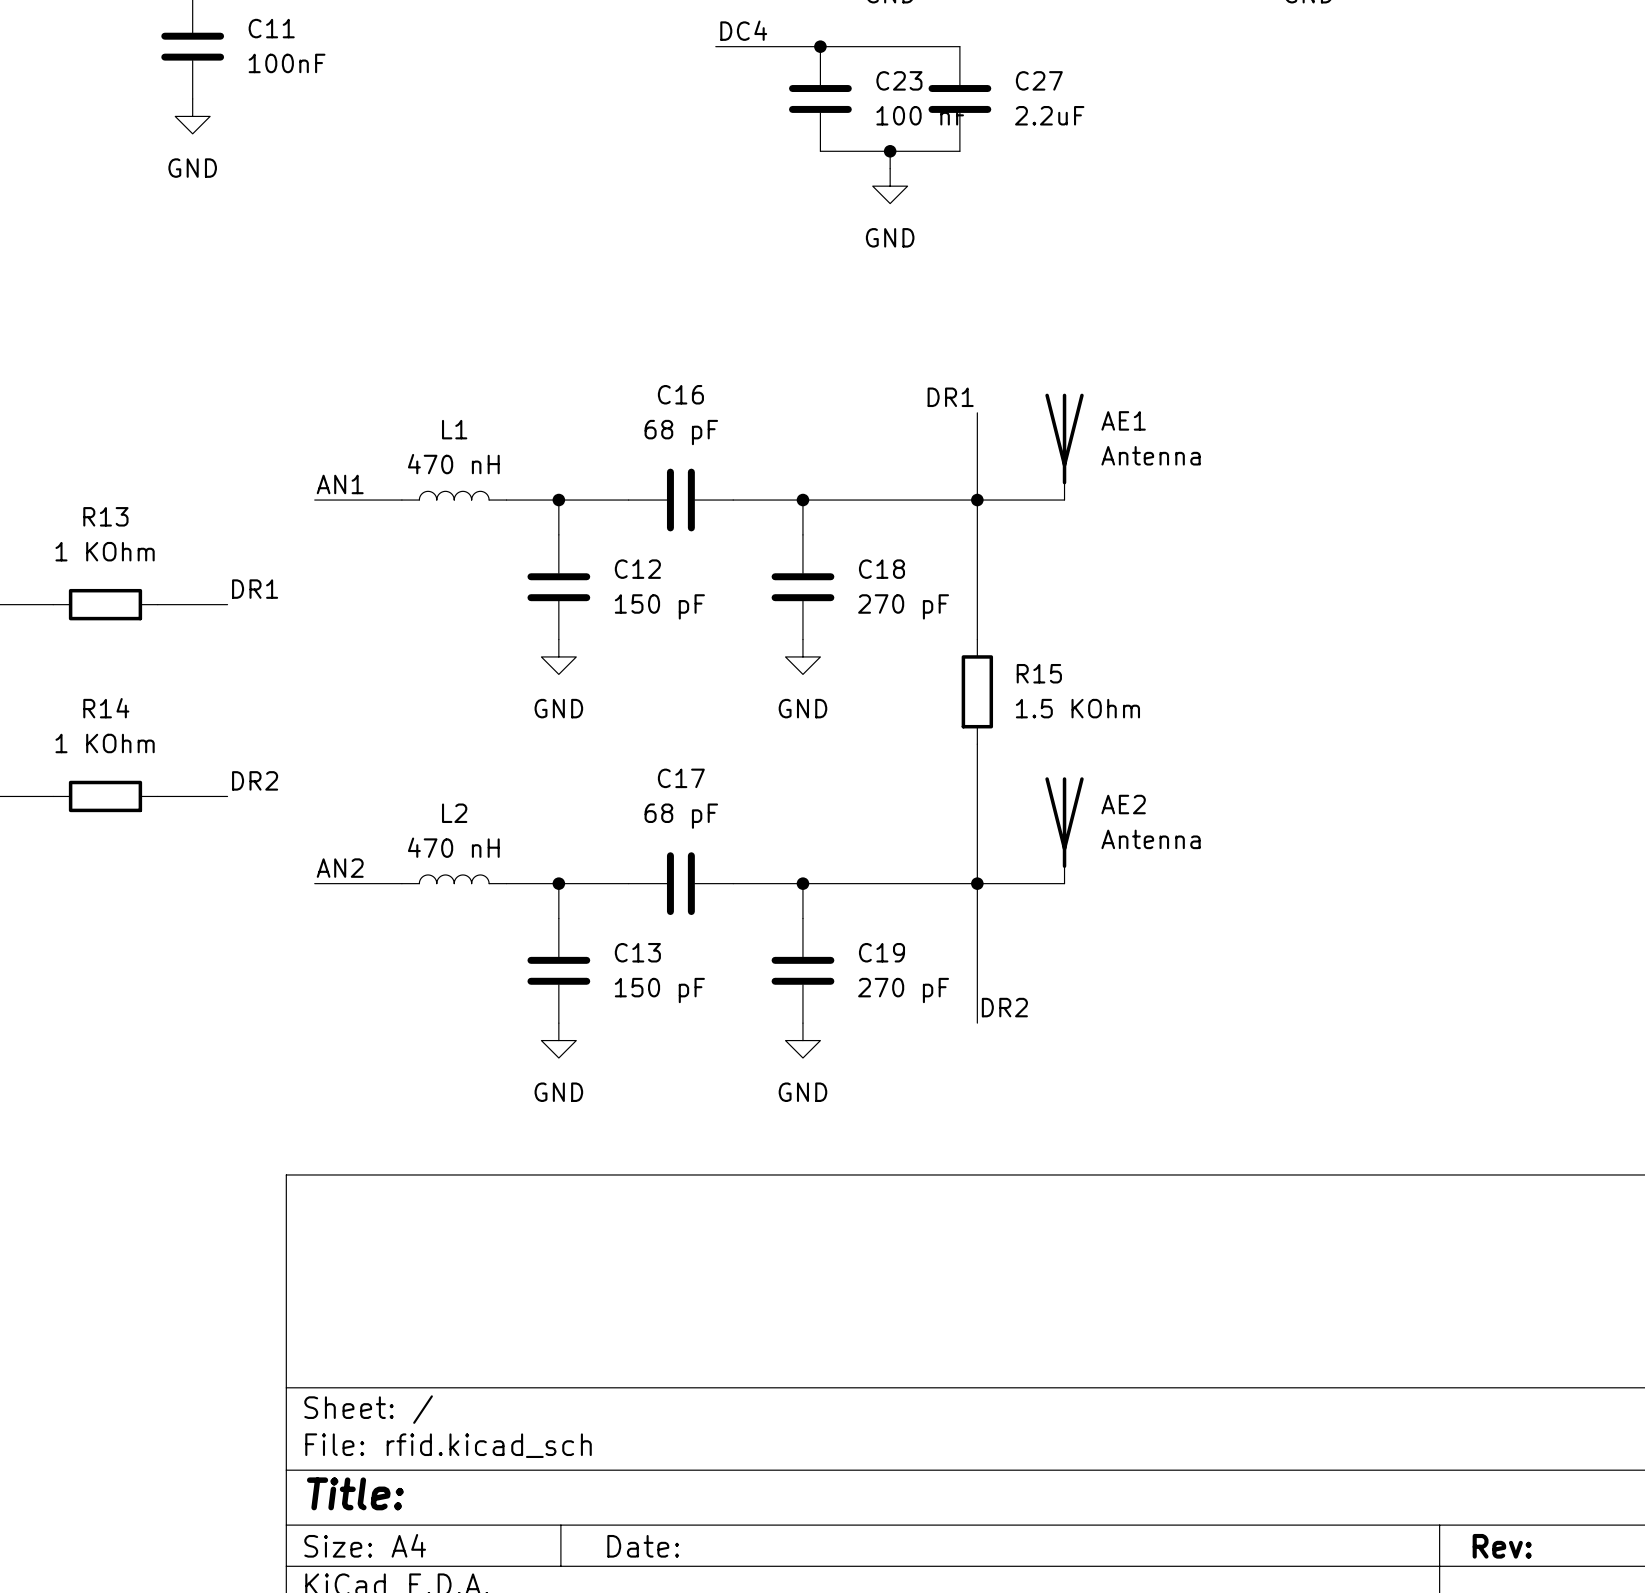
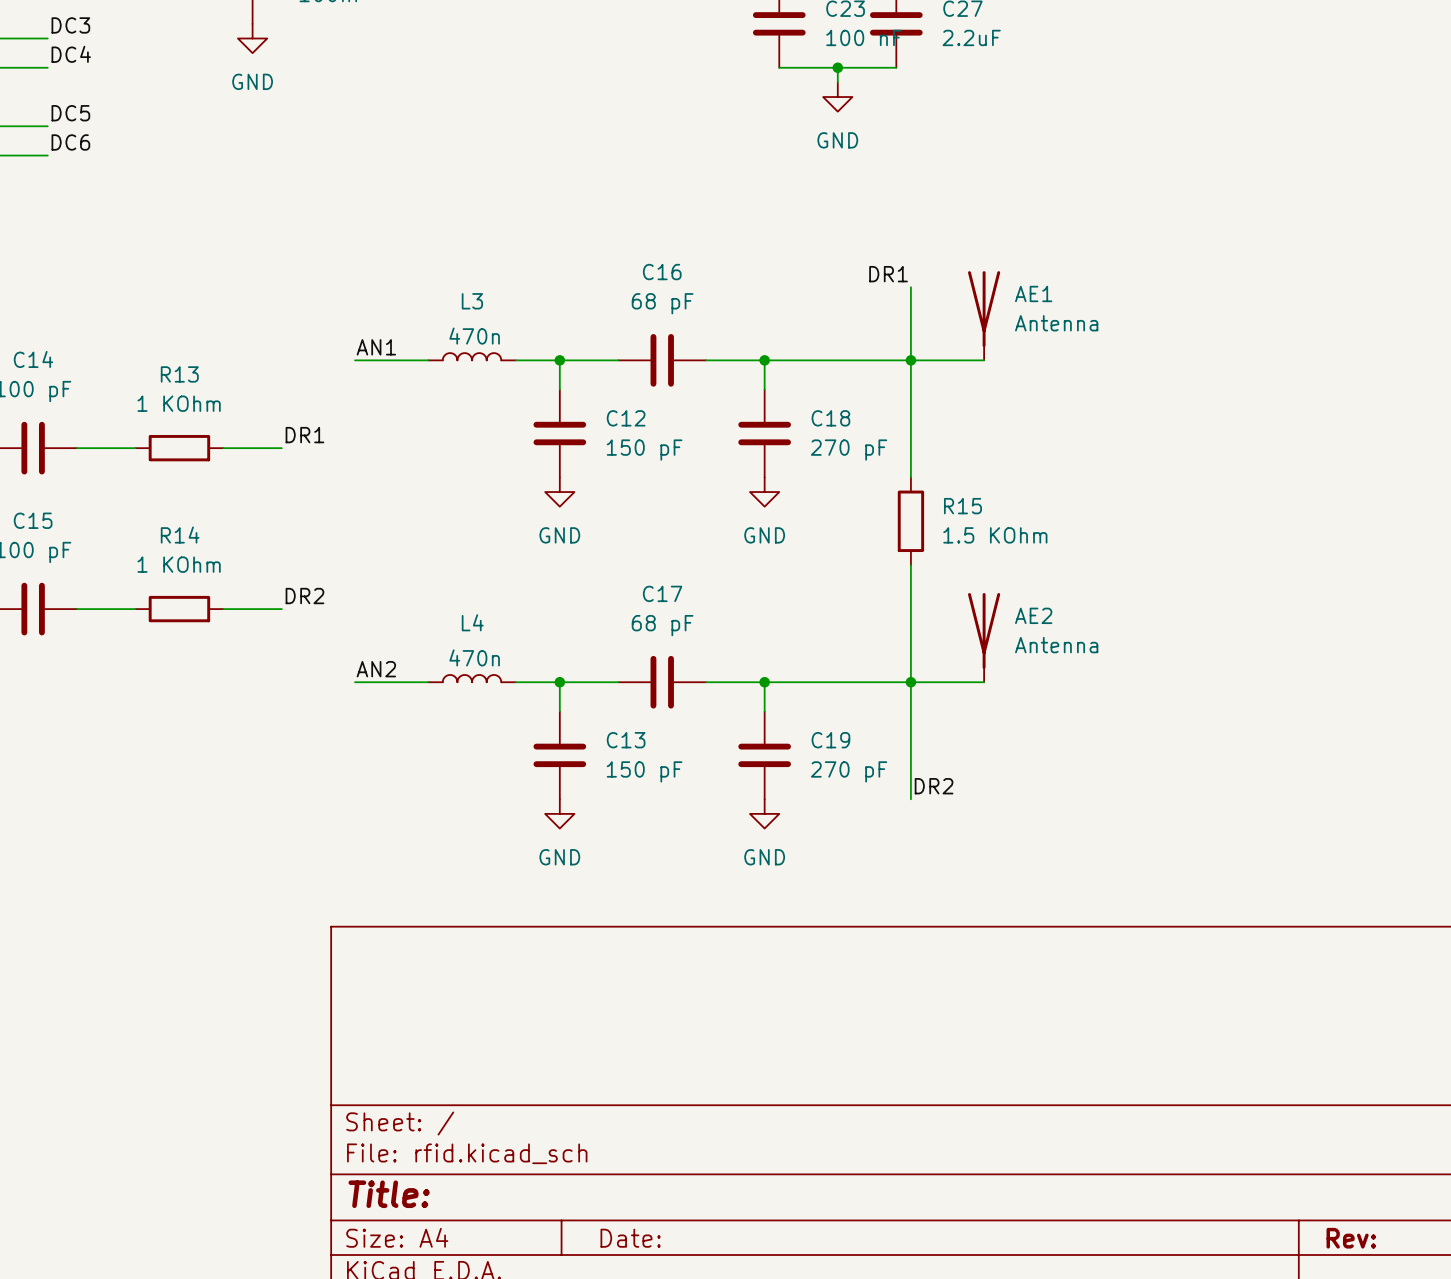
L1 name: L1 (454, 429) -> L3 (472, 301)
L1 value: 470 nH (453, 464) -> 470n (474, 336)
L2 name: L2 (454, 813) -> L4 (472, 622)
L2 value: 470 nH (453, 847) -> 470n (474, 657)

